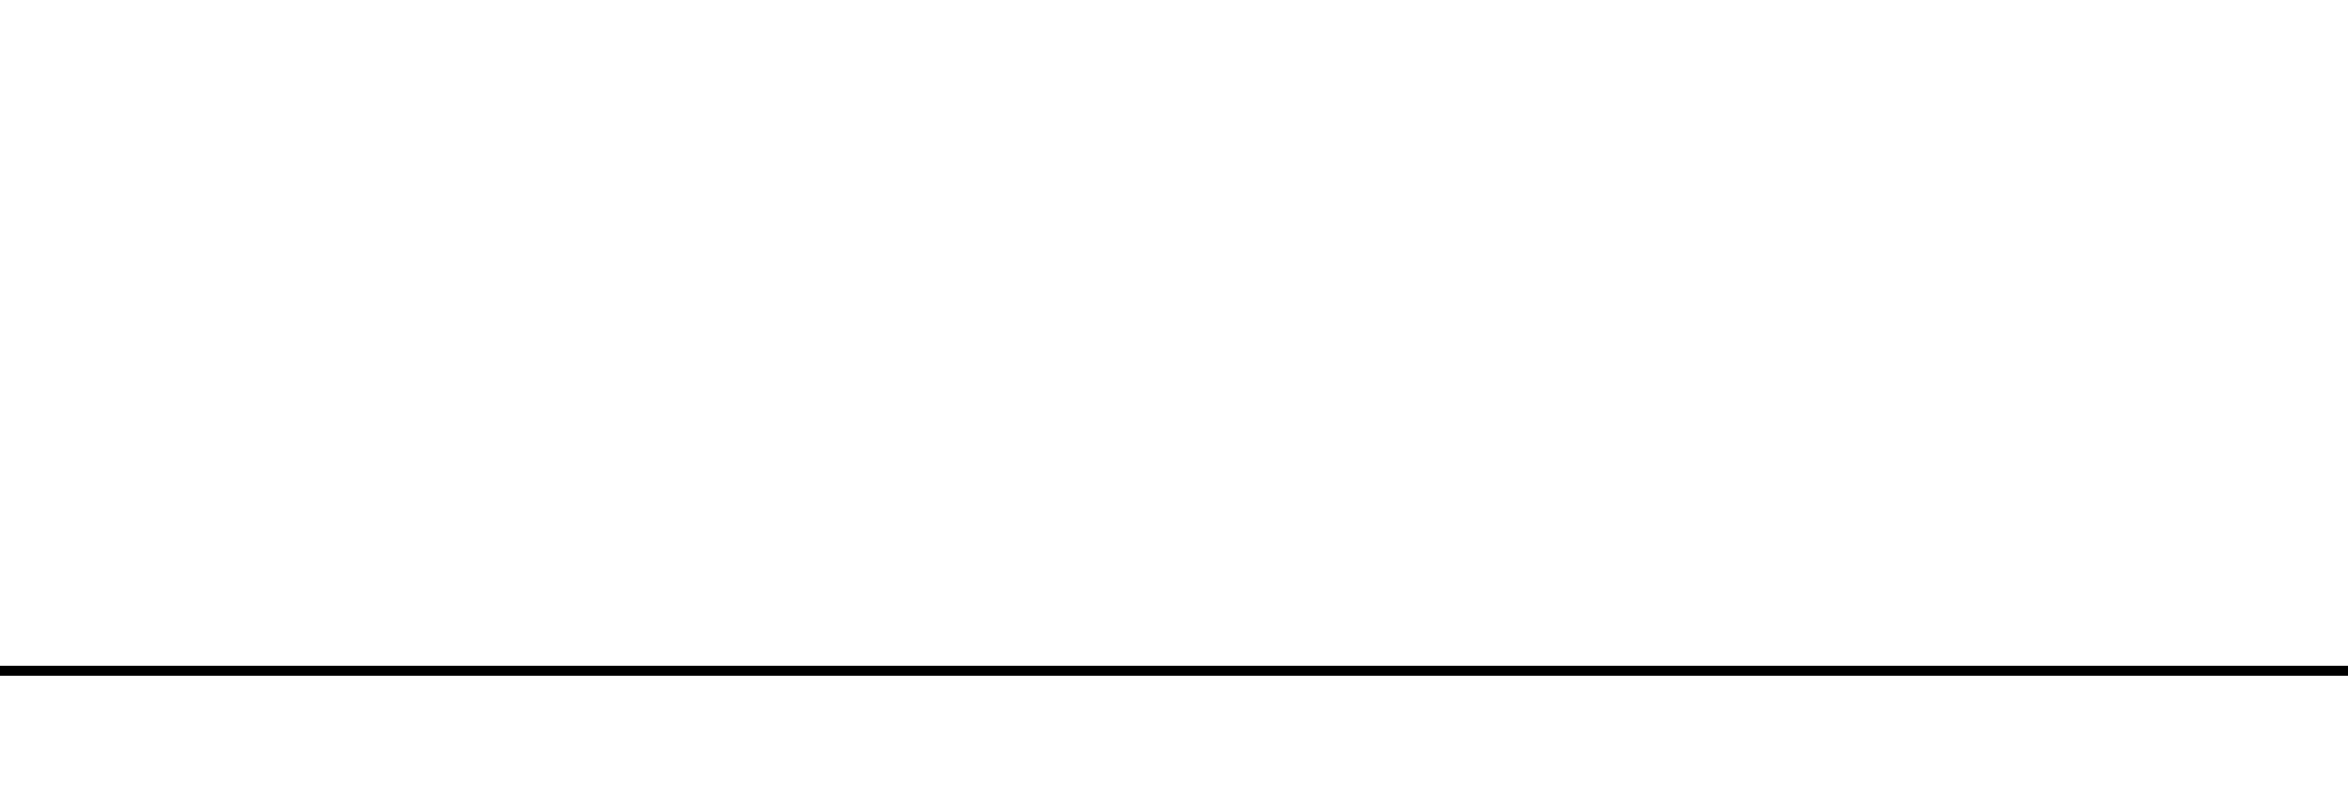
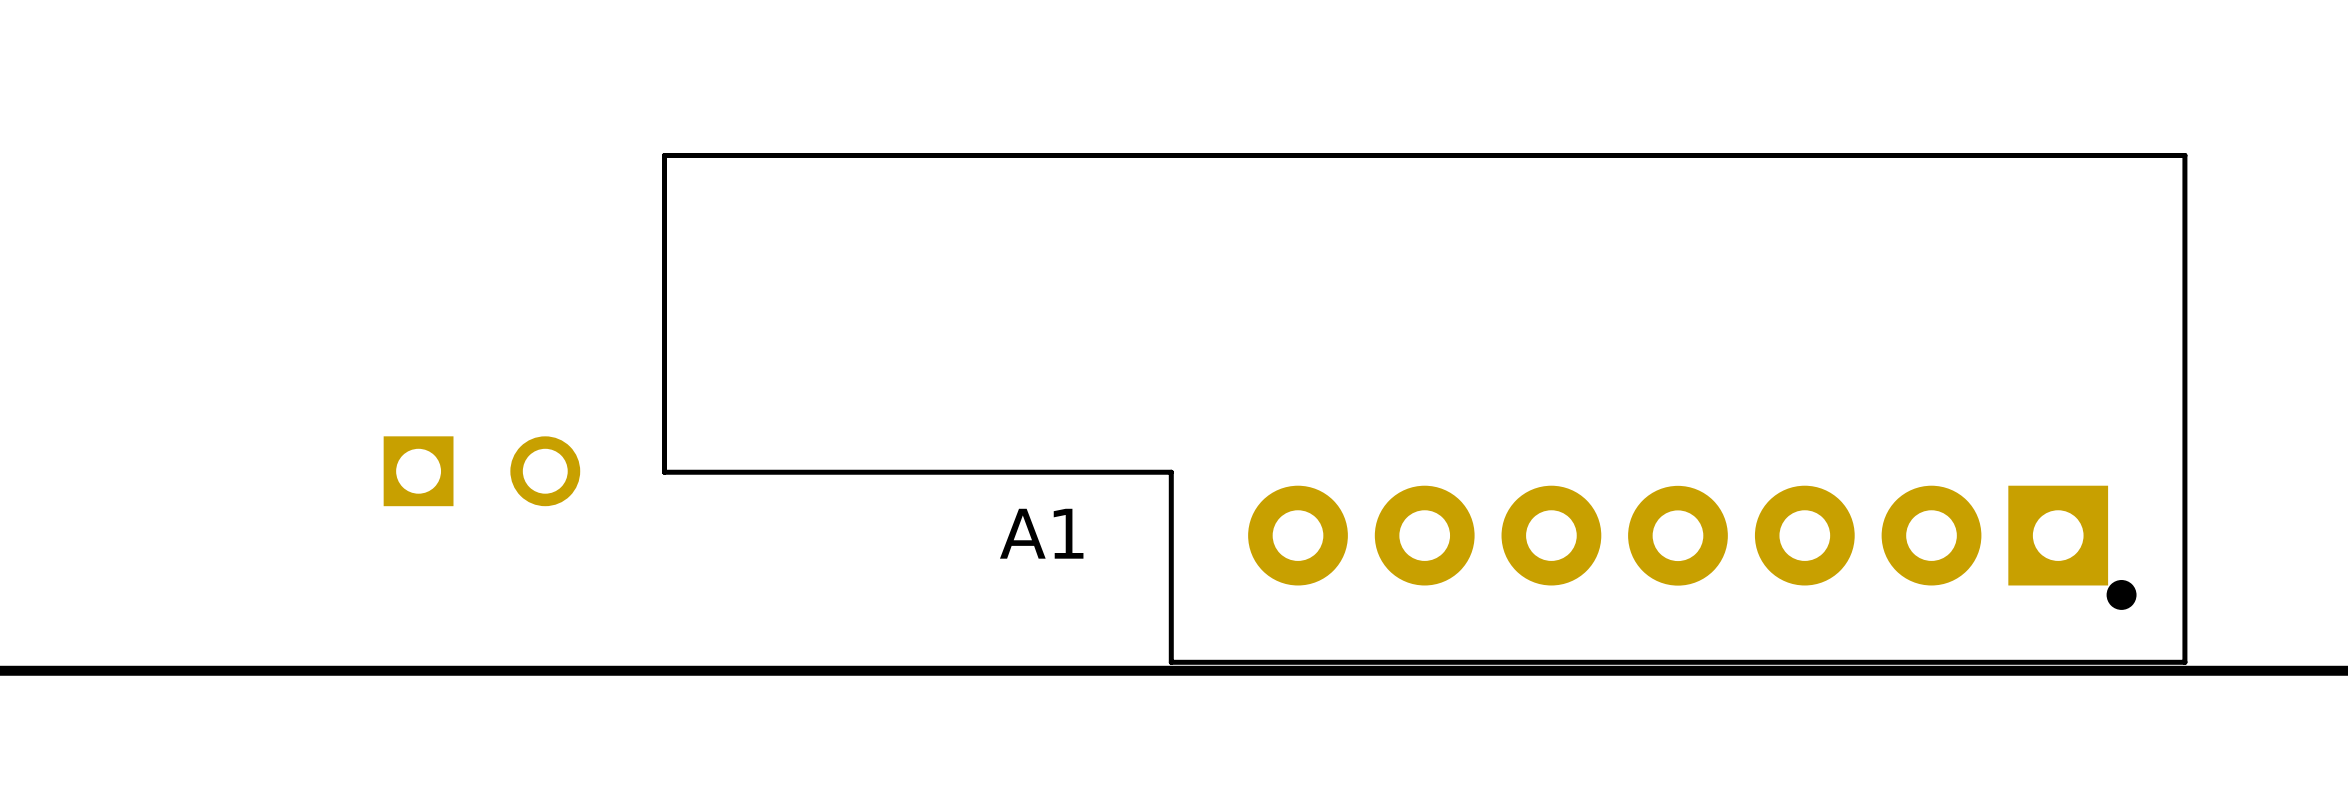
A1: none -> (1424, 408)
part: none -> (481, 471)

